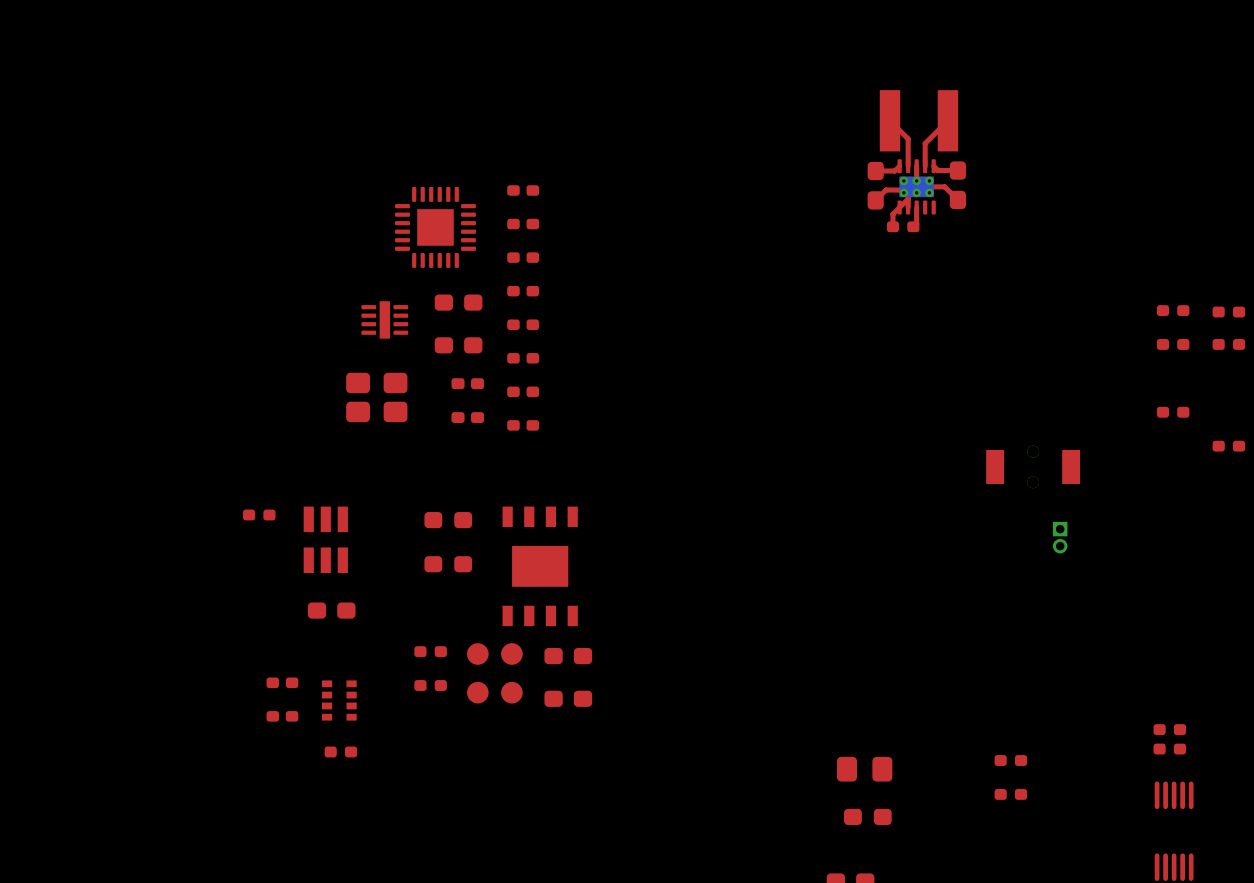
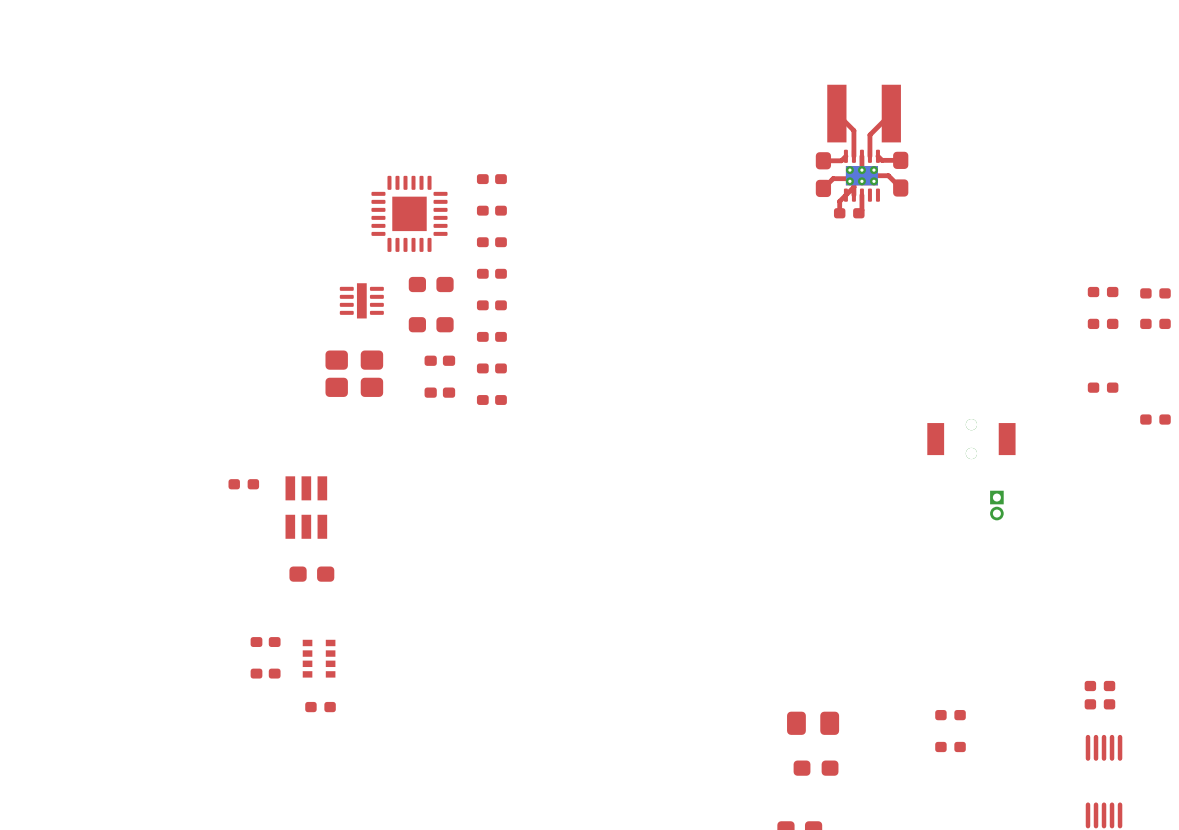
part: (448, 520) -> none
part: (448, 564) -> none
part: (540, 566) -> none
part: (430, 651) -> none
part: (494, 654) -> none
part: (568, 656) -> none
part: (430, 685) -> none
part: (494, 692) -> none
part: (568, 698) -> none

